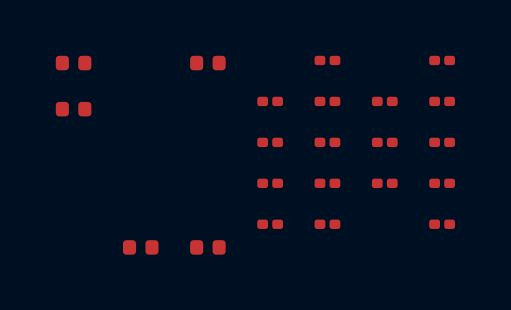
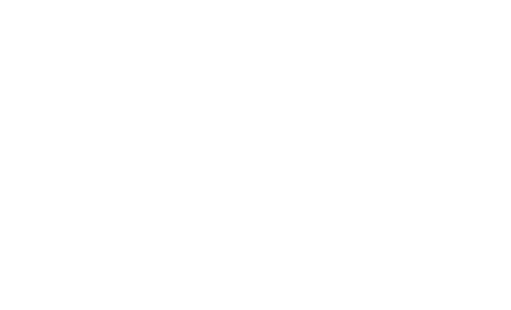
part: (327, 60) -> none
part: (442, 60) -> none
part: (73, 63) -> none
part: (207, 63) -> none
part: (270, 101) -> none
part: (327, 101) -> none
part: (384, 101) -> none
part: (442, 101) -> none
part: (73, 109) -> none
part: (270, 142) -> none
part: (327, 142) -> none
part: (384, 142) -> none
part: (442, 142) -> none
part: (270, 183) -> none
part: (327, 183) -> none
part: (384, 183) -> none
part: (442, 183) -> none
part: (270, 224) -> none
part: (327, 224) -> none
part: (442, 224) -> none
part: (140, 247) -> none
part: (207, 247) -> none

